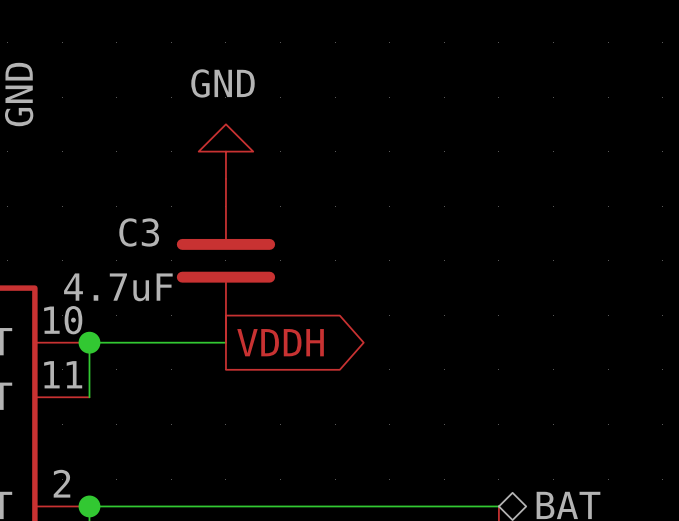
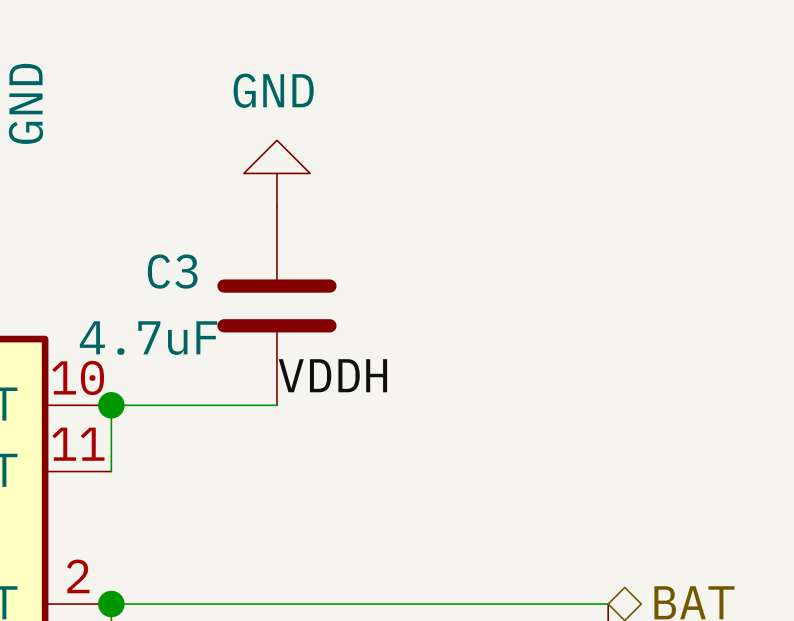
label: none -> VDDH (332, 375)
global label: VDDH (280, 342) -> none

